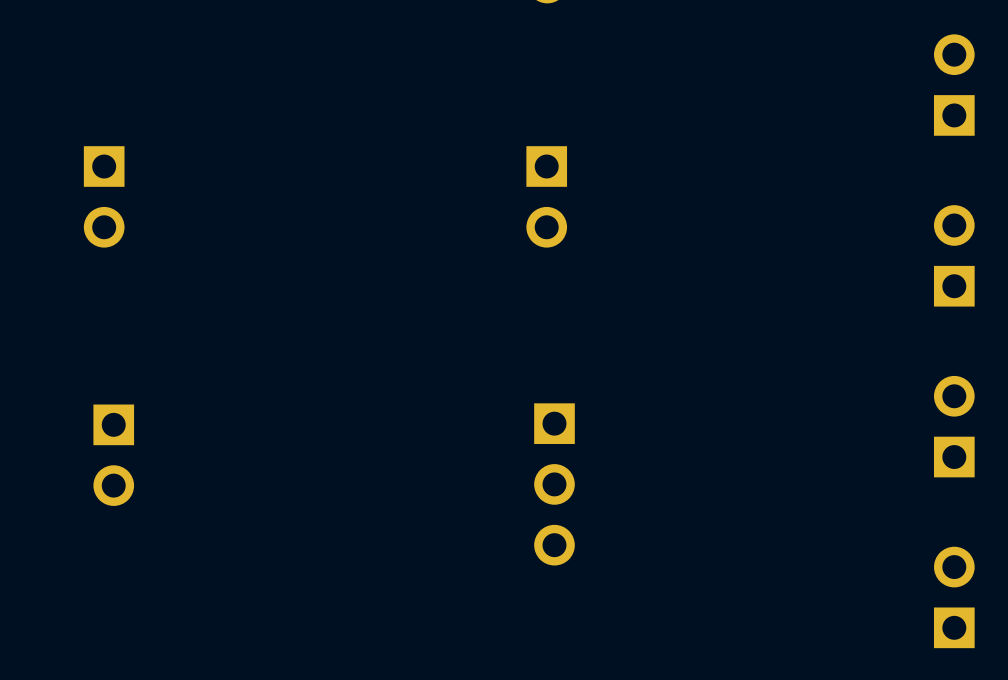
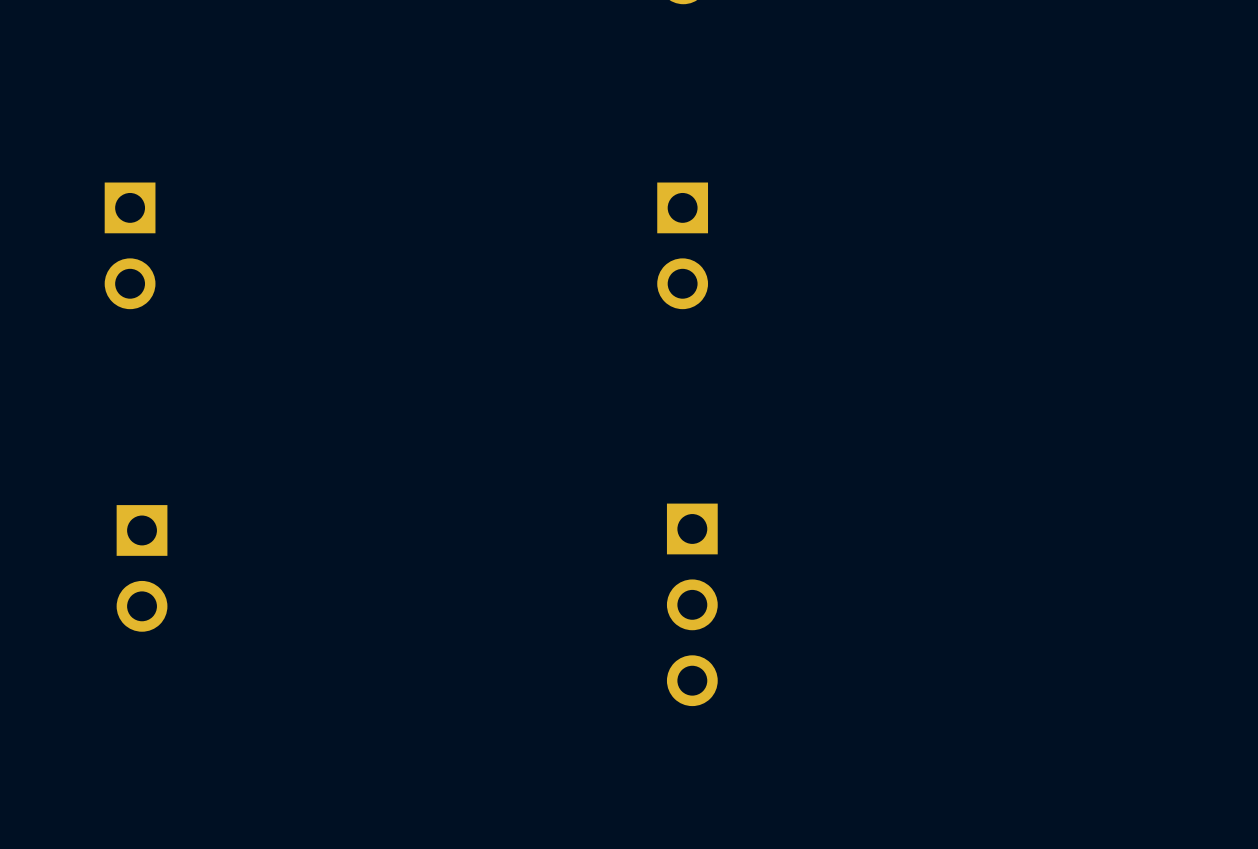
part: (954, 85) -> none
part: (954, 255) -> none
part: (954, 426) -> none
part: (954, 597) -> none

